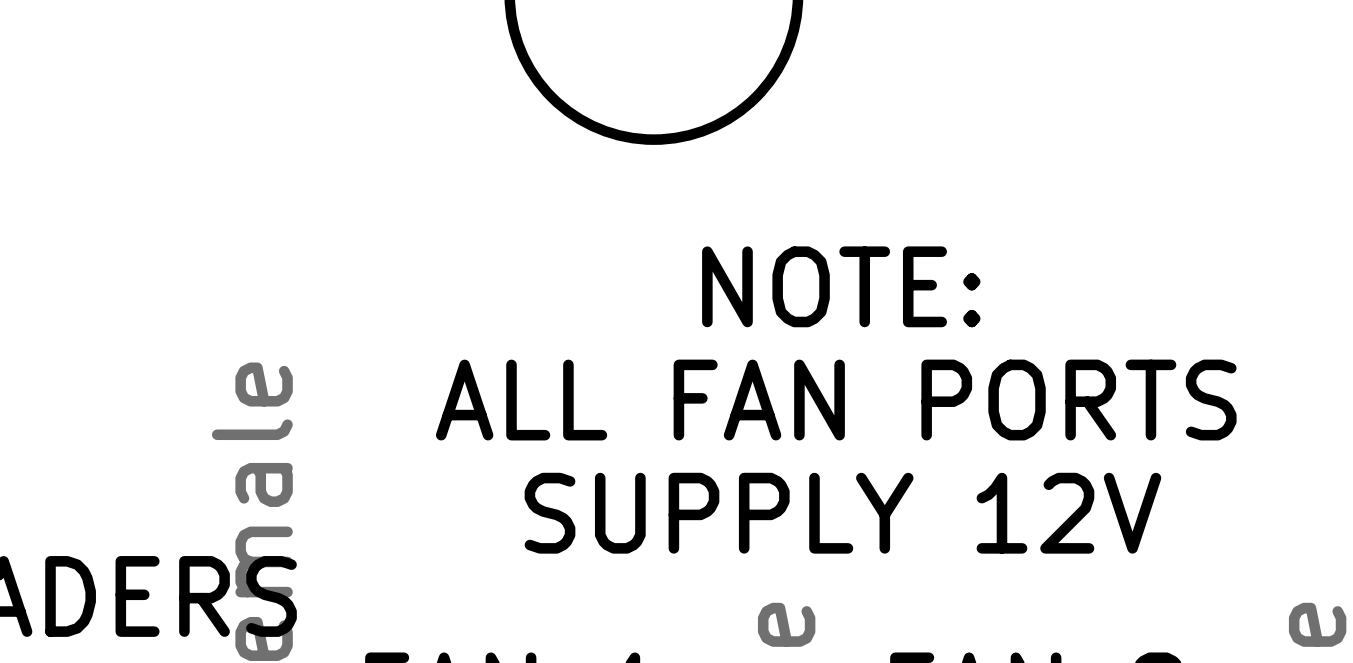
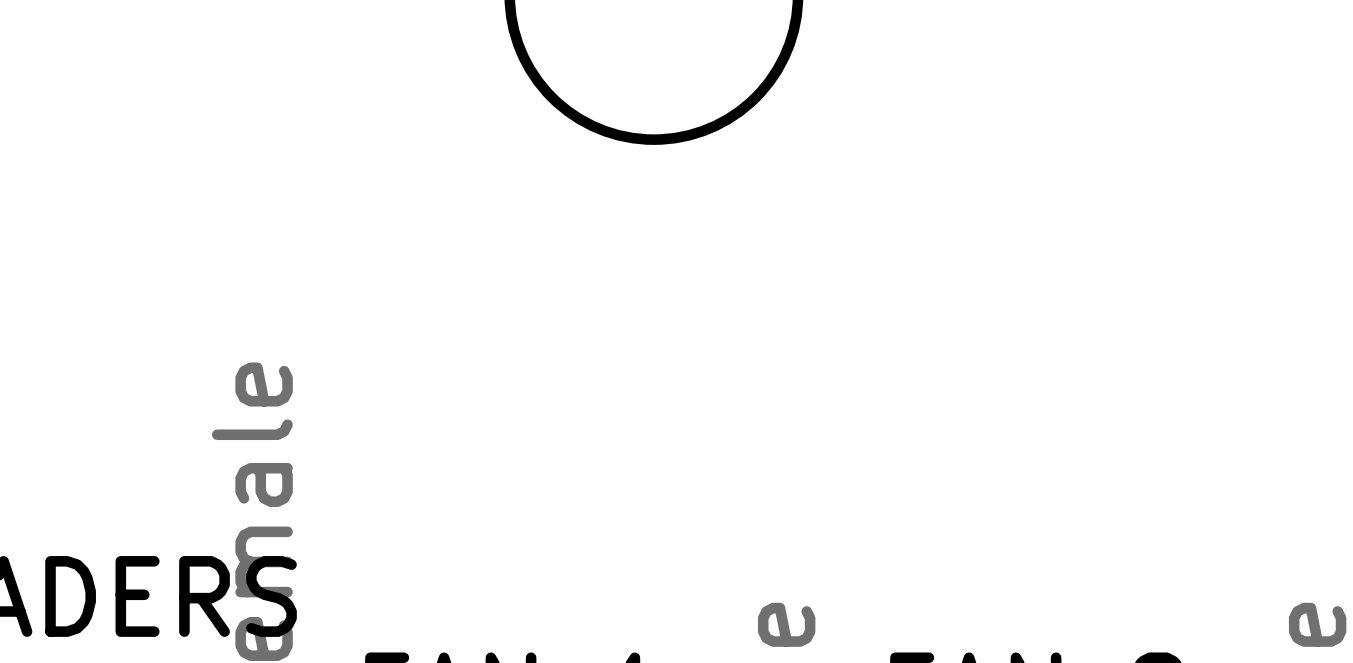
text: NOTE: (841, 286) -> none
text: ALL FAN PORTS (836, 400) -> none
text: SUPPLY 12V (842, 513) -> none

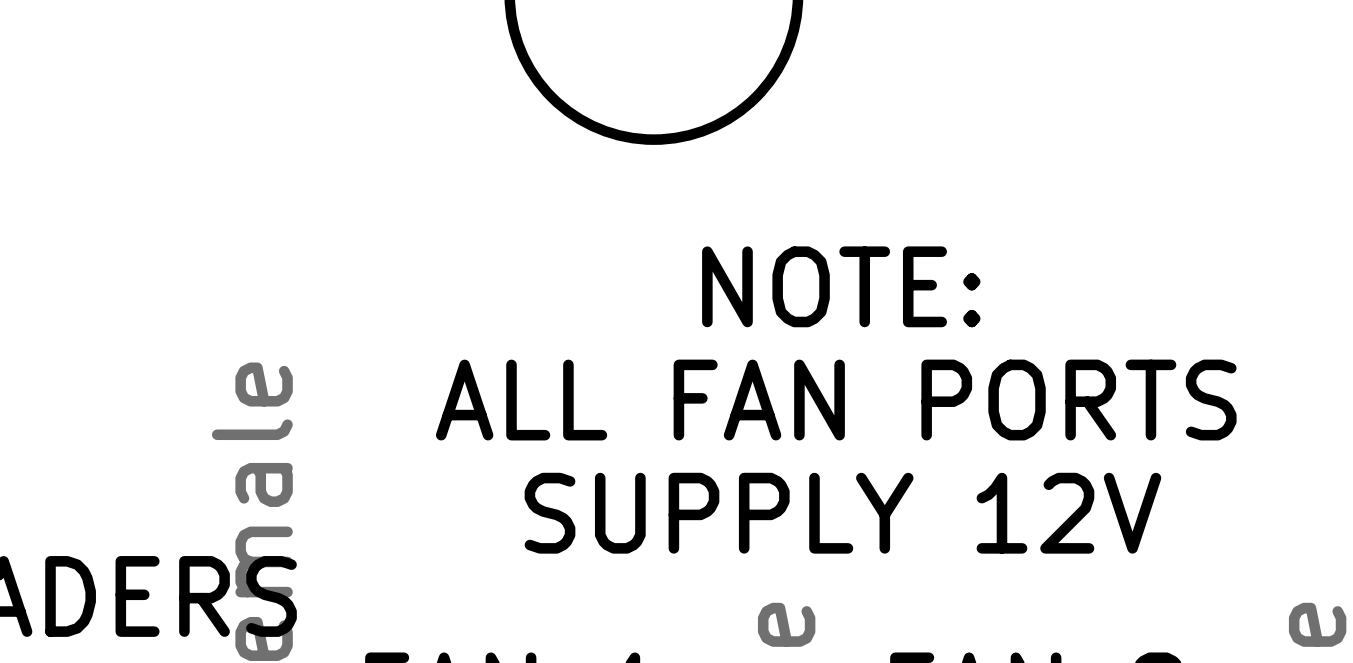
text: none -> NOTE: (841, 286)
text: none -> ALL FAN PORTS (836, 400)
text: none -> SUPPLY 12V (842, 513)

